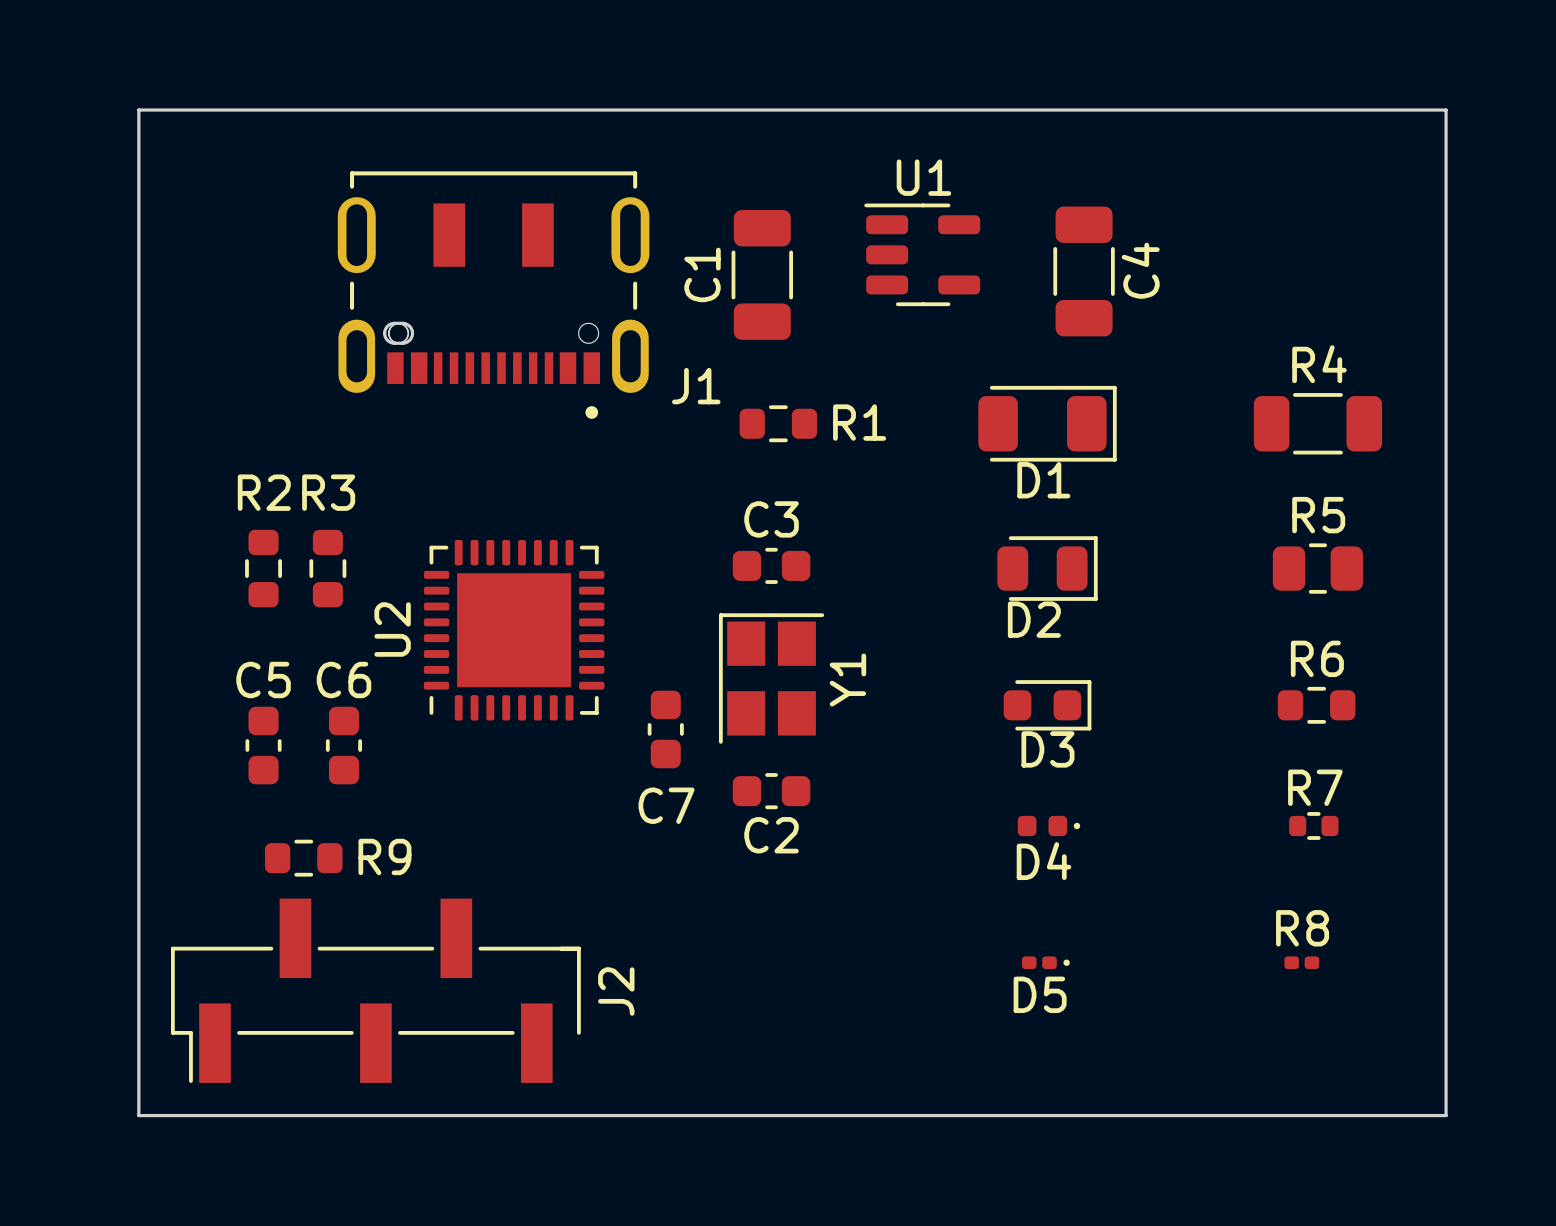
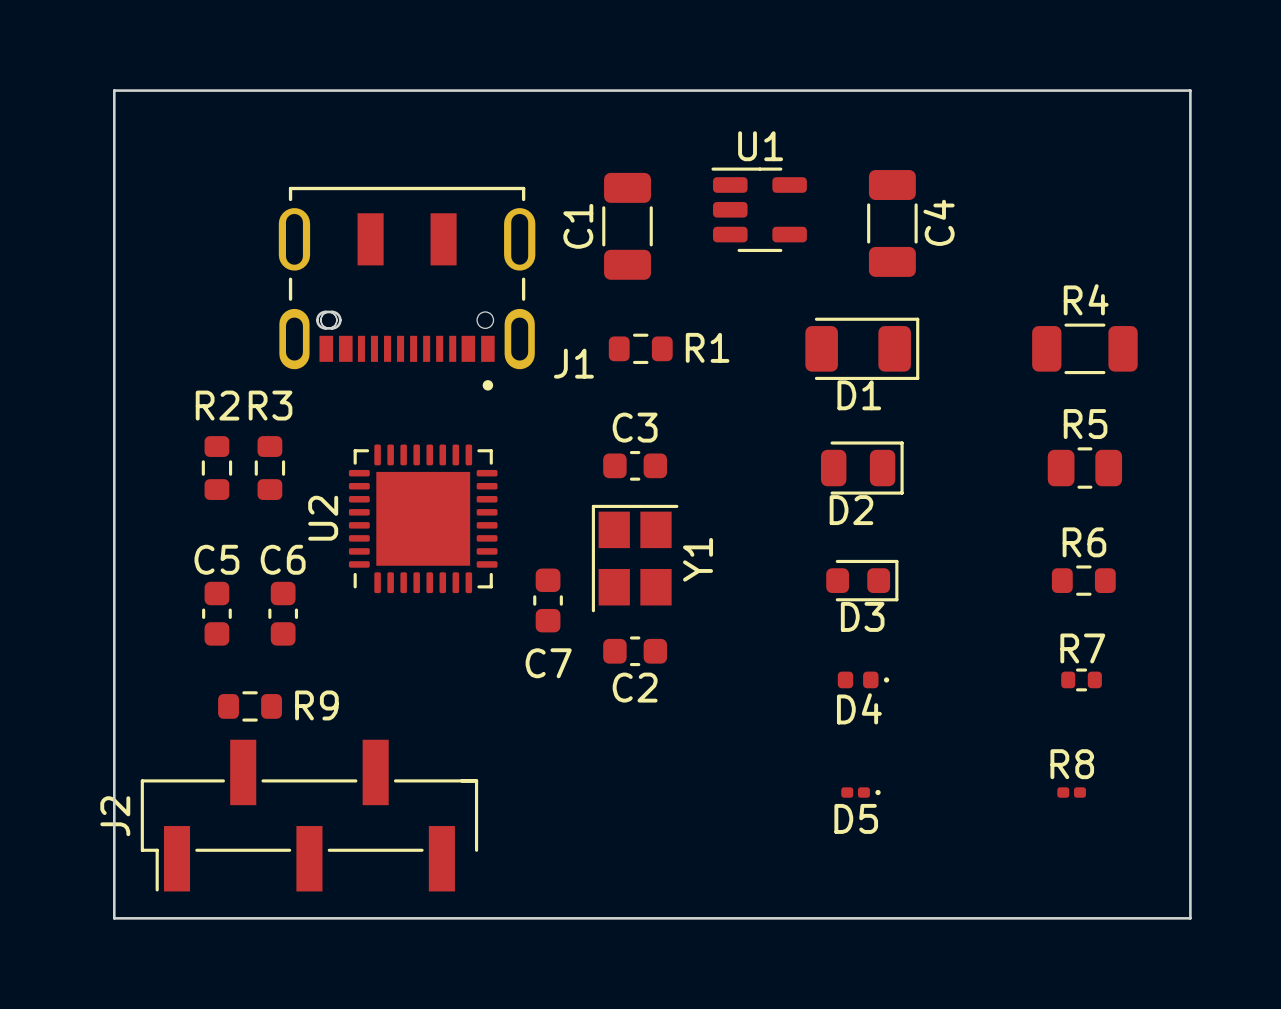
J1 position: (493, 295) -> (407, 288)
J2 name position: J2 (616, 991) -> J2 (115, 816)

